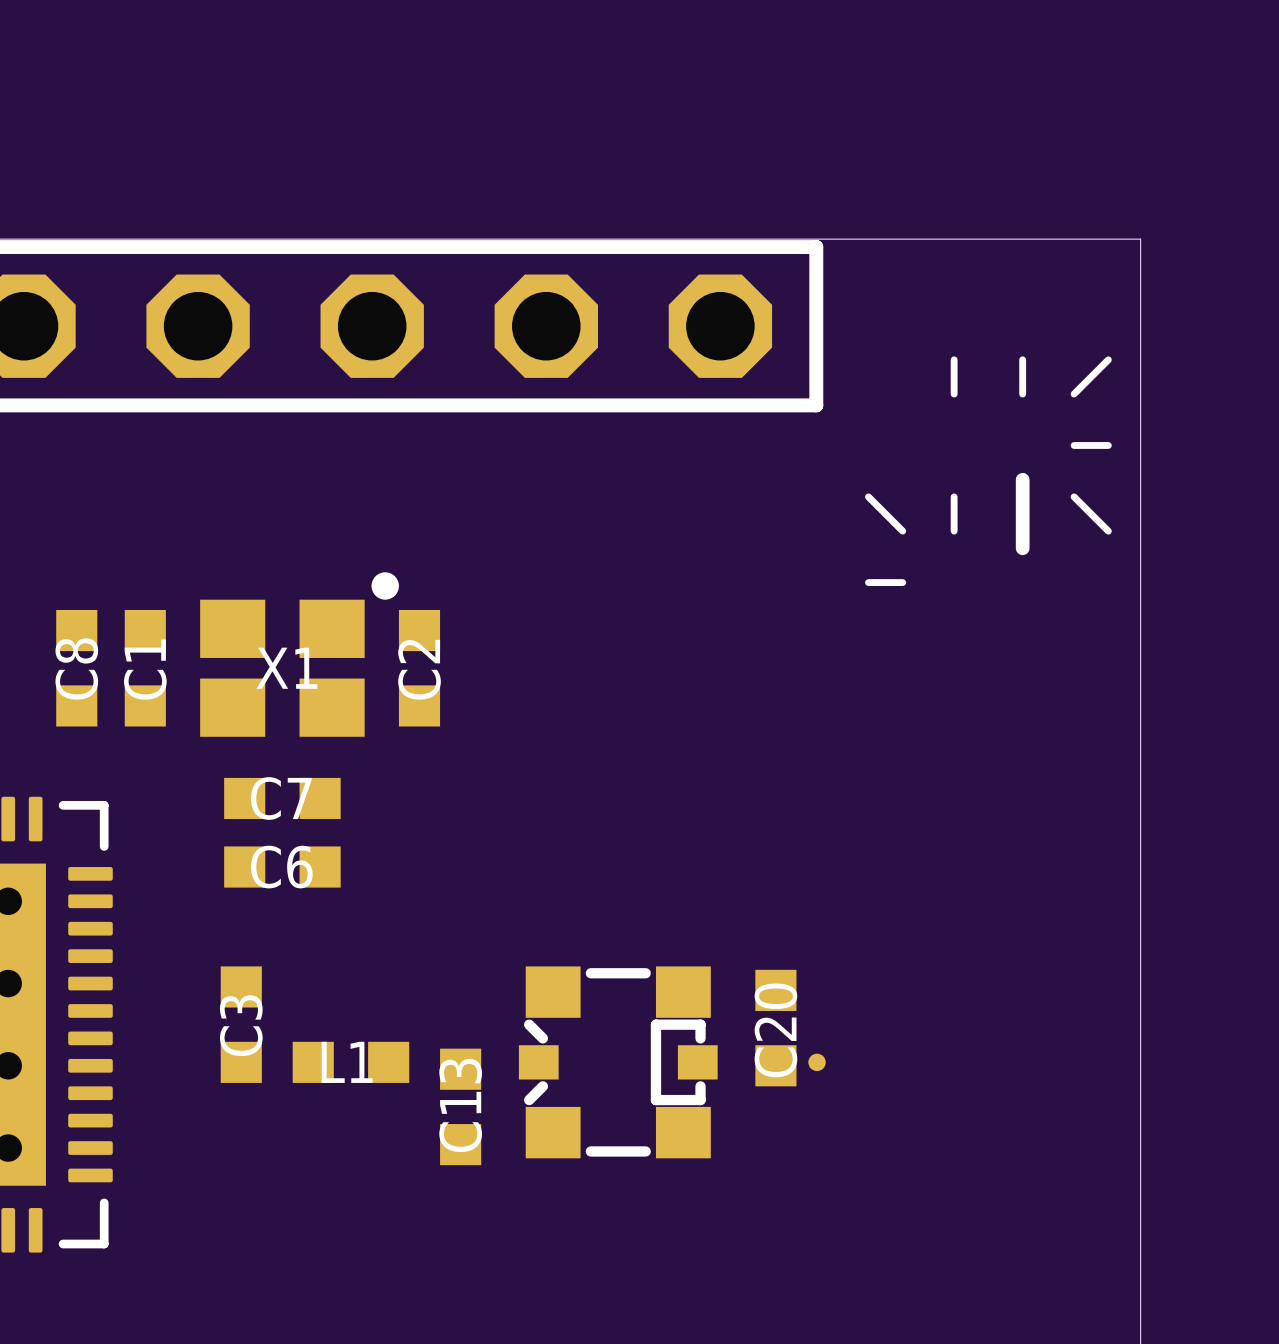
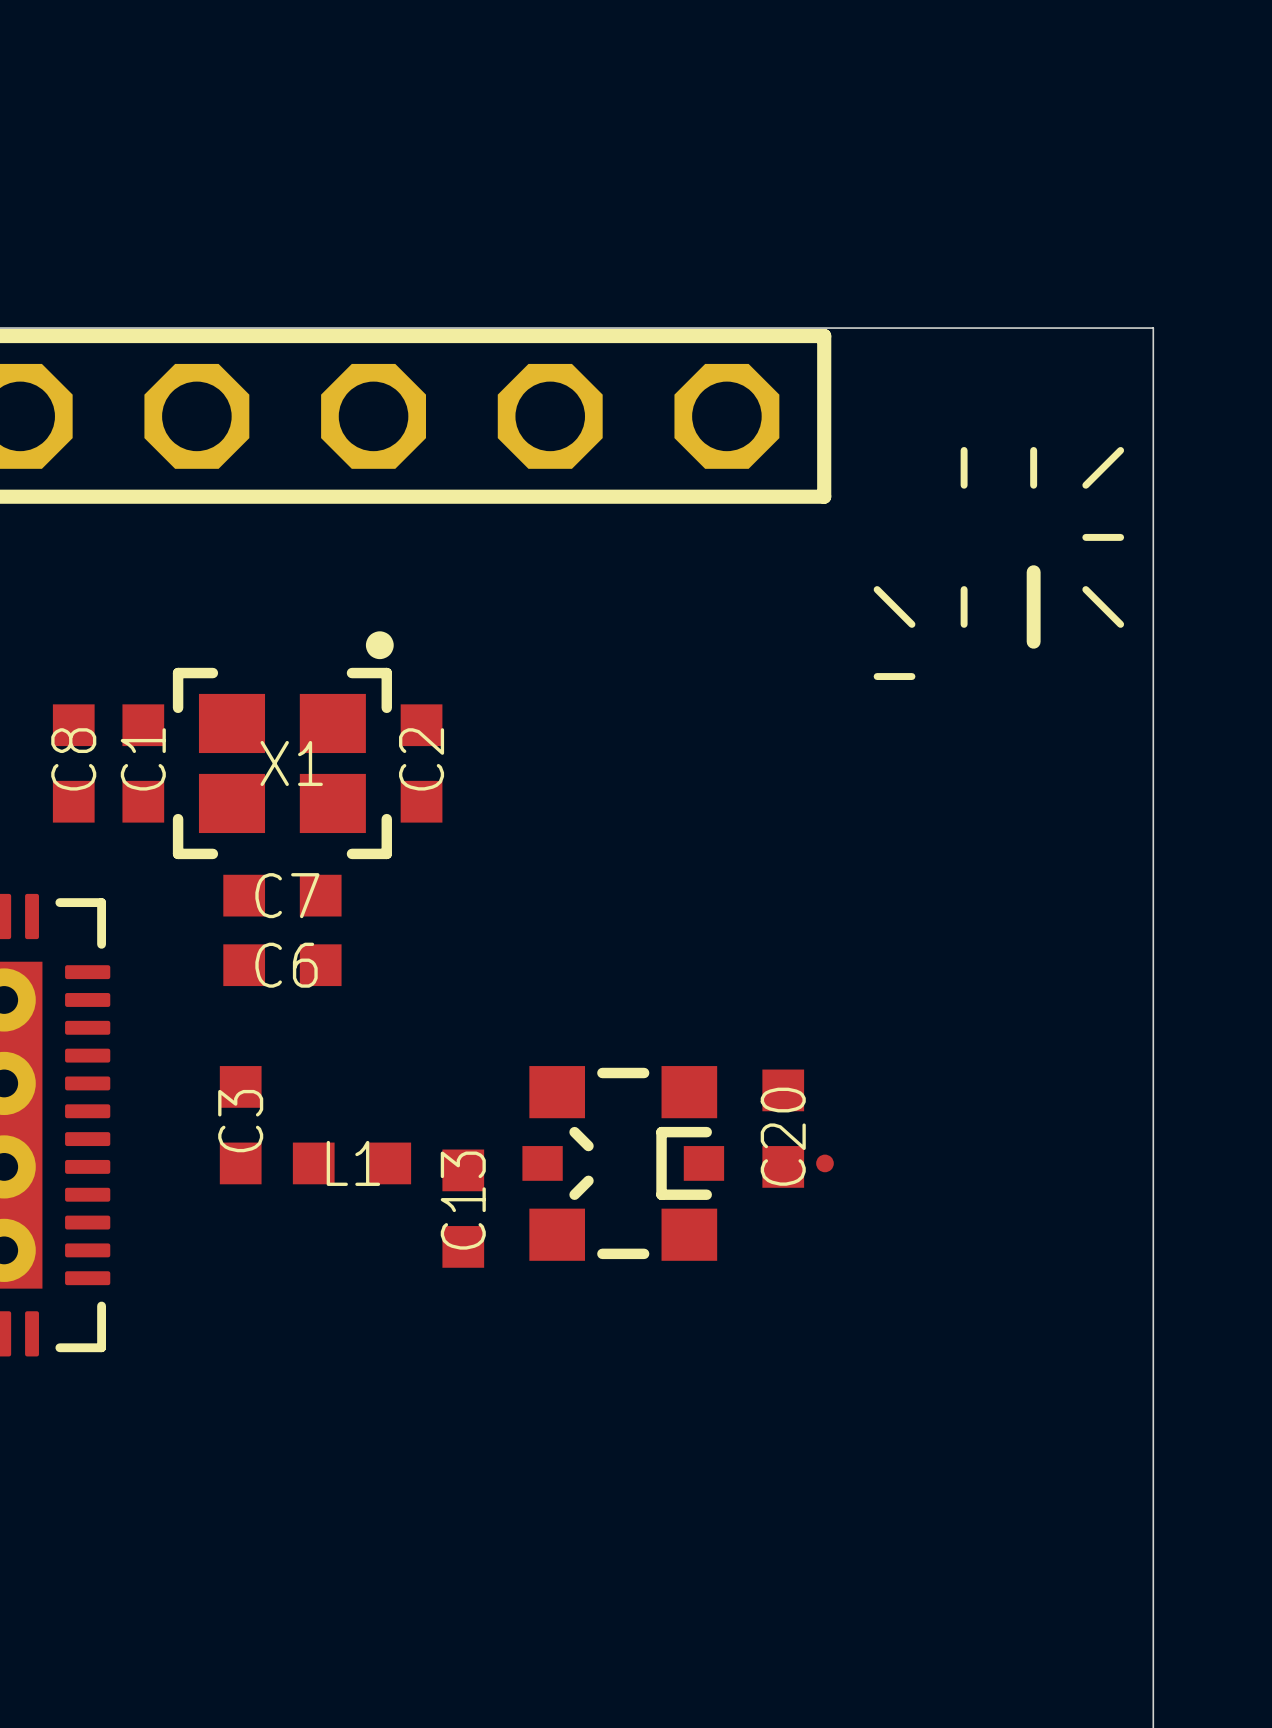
X1 footprint: [200, 572, 399, 737] -> [172, 631, 394, 860]
part footprint: [518, 966, 718, 1159] -> [522, 1066, 725, 1261]

